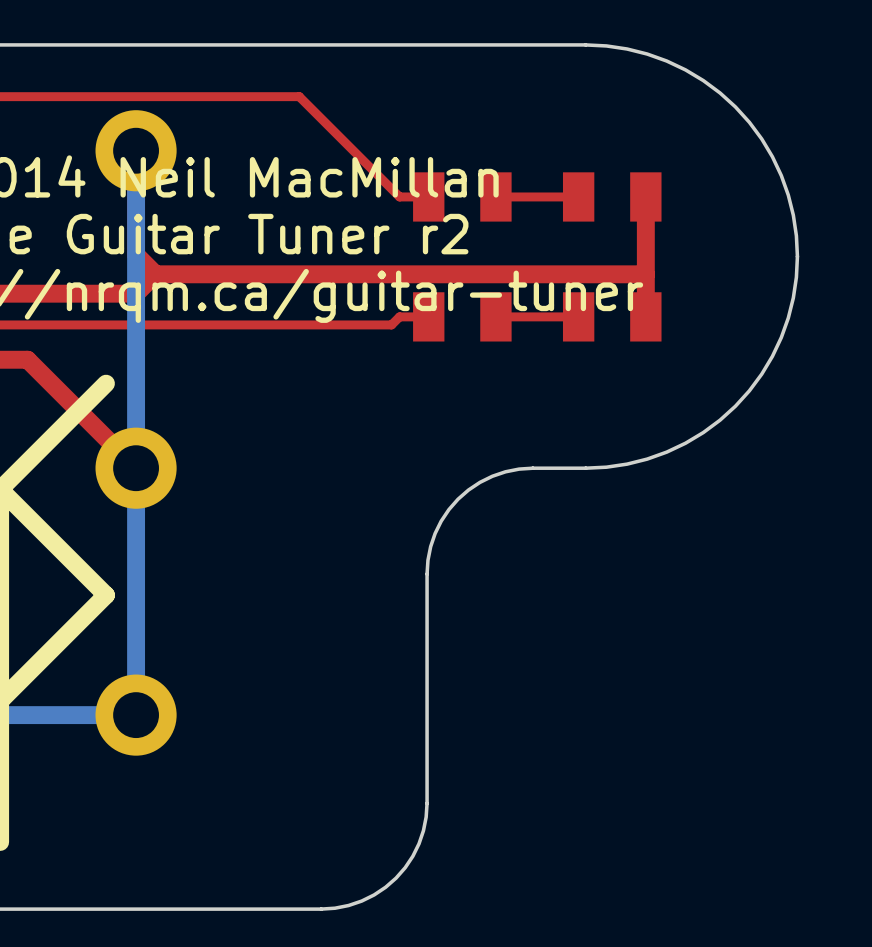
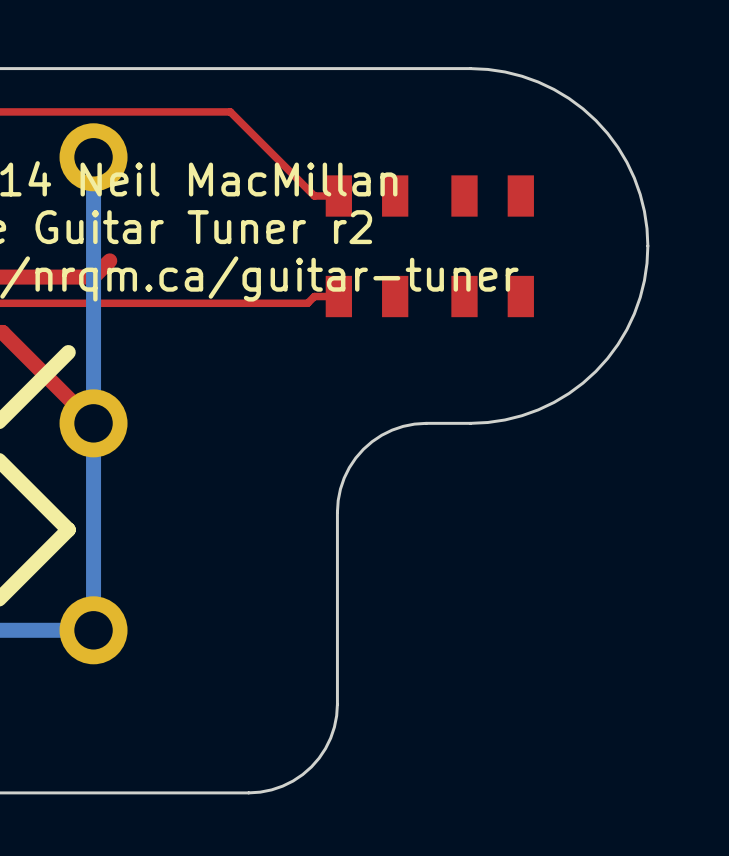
top track: (136, 150) (136, 254) (155, 274) (645, 274) -> none
top track: (578, 196) (495, 196) -> none
top track: (645, 196) (645, 316) -> none
top track: (578, 316) (495, 316) -> none

